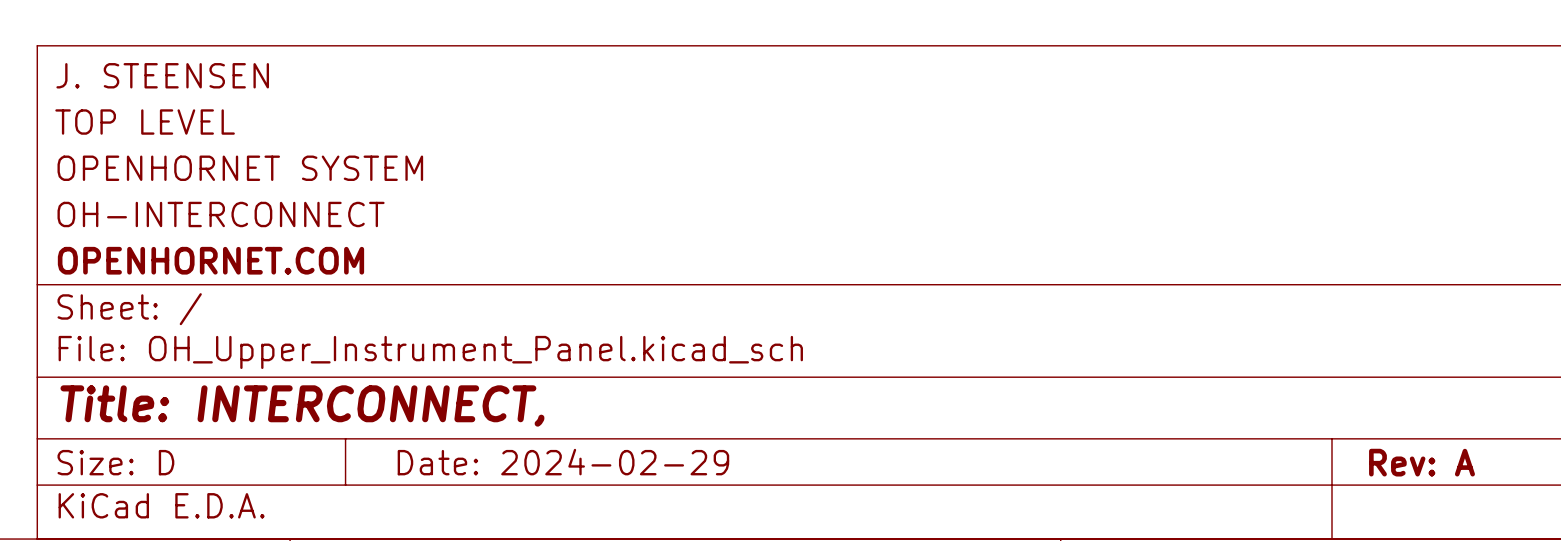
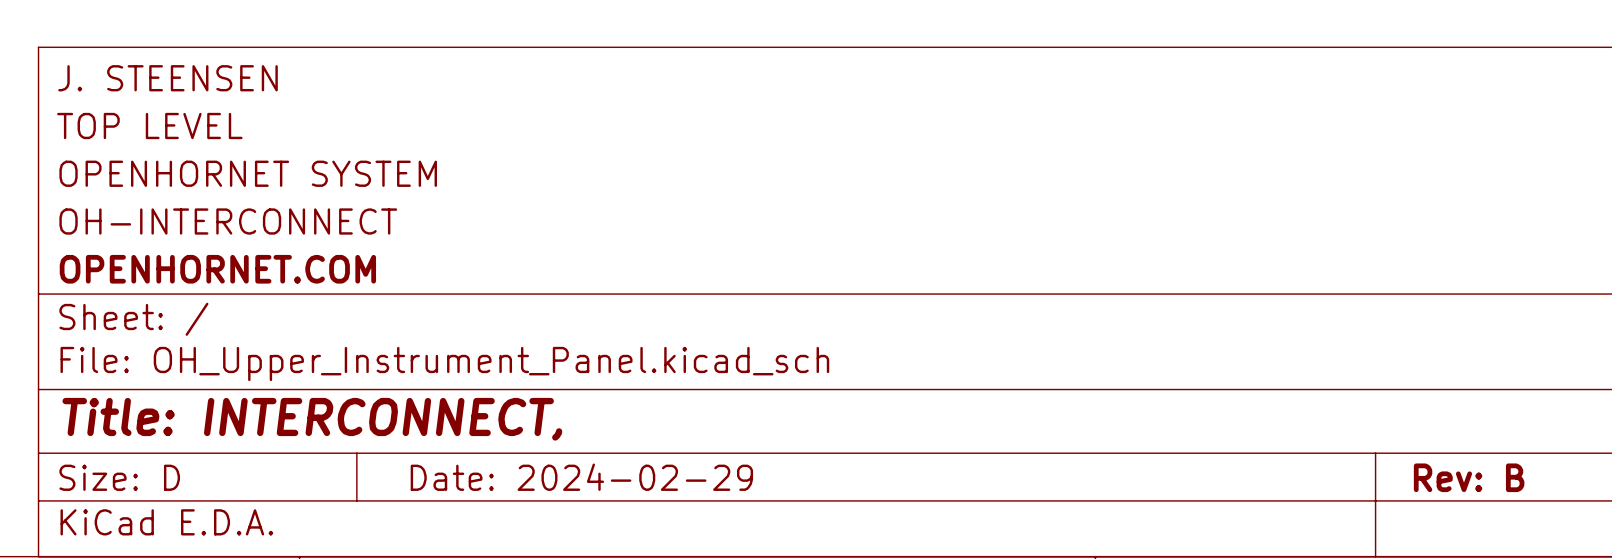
title block: Rev: A (1422, 462) -> Rev: B (1469, 477)

